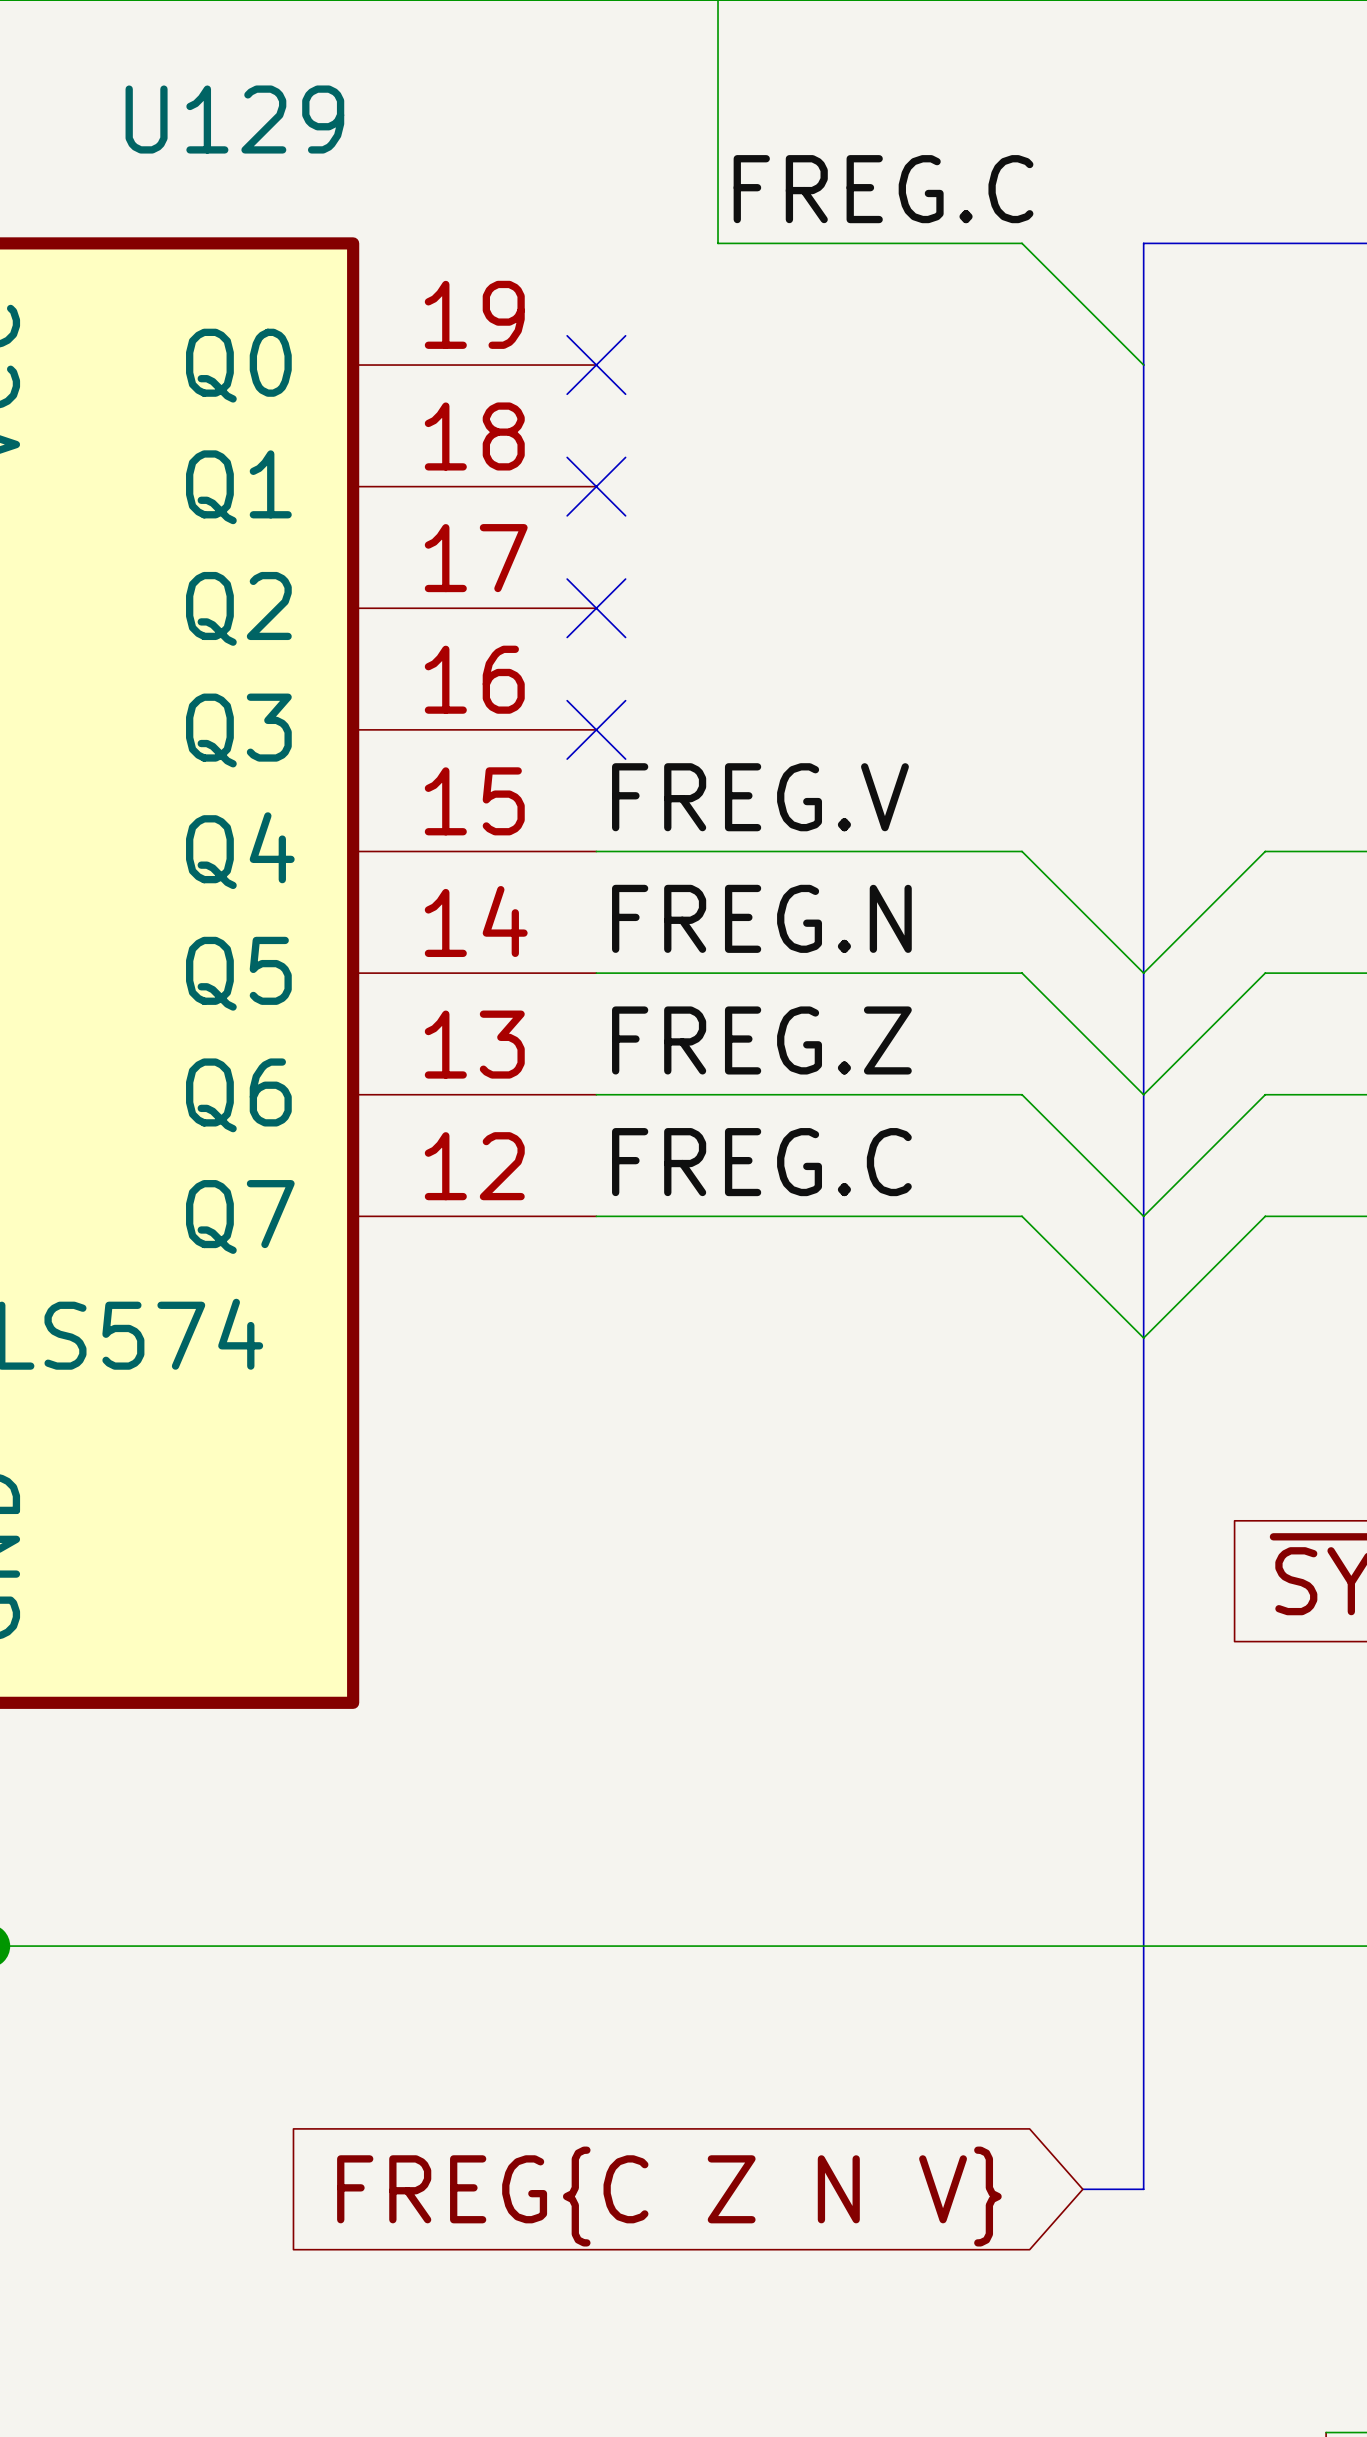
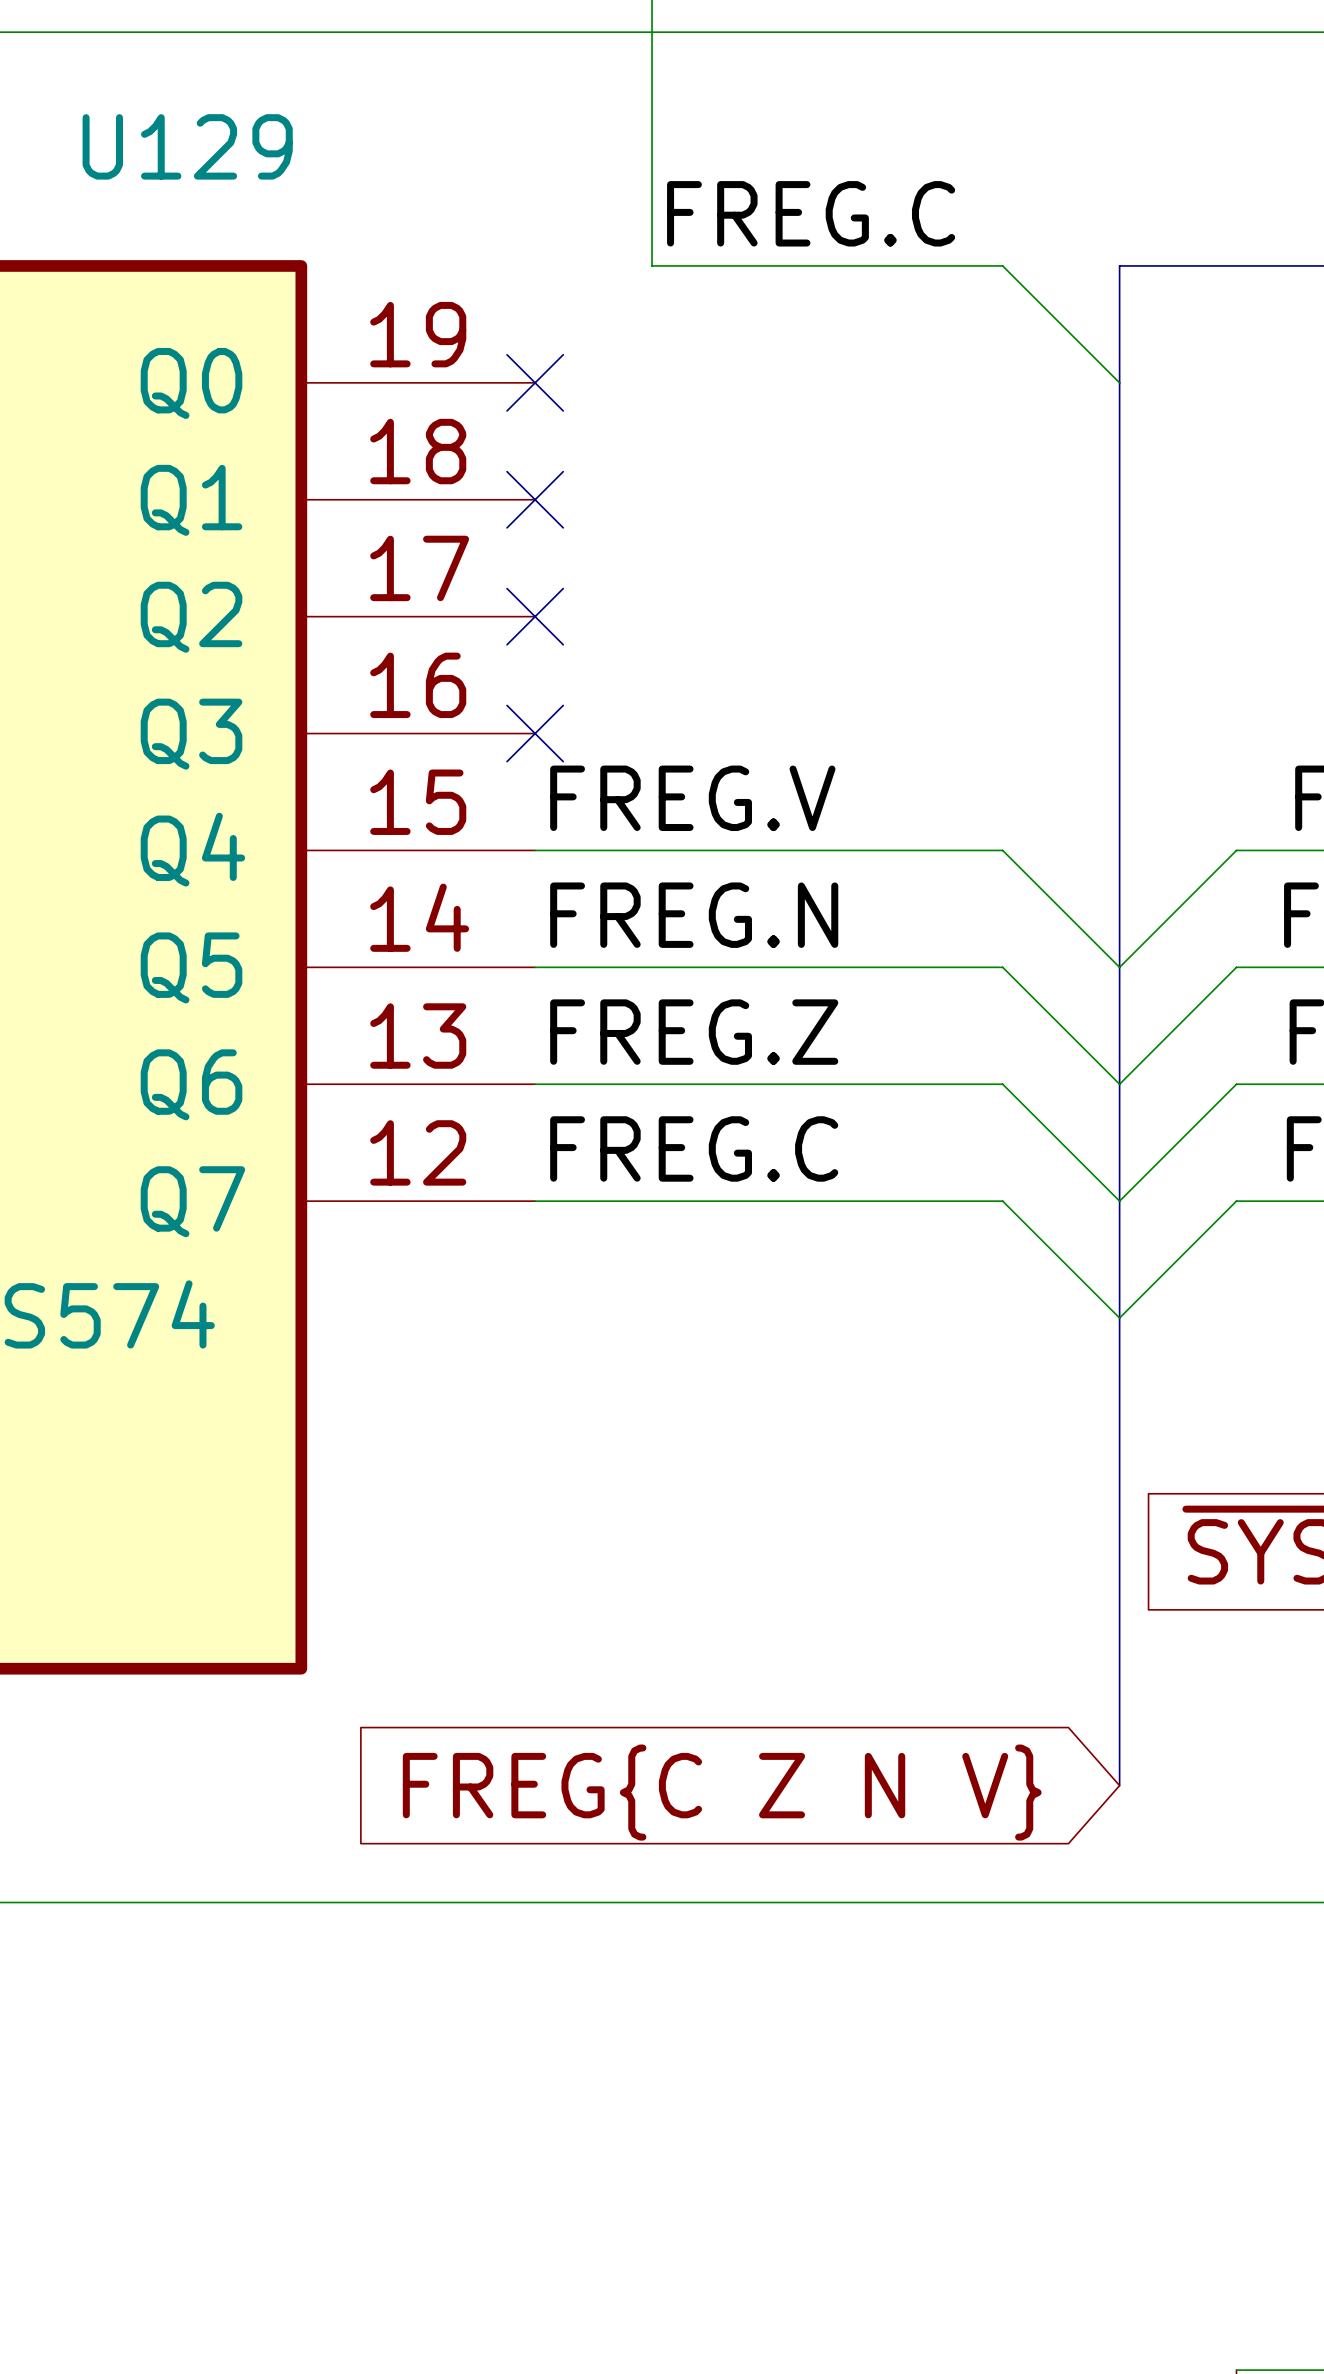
wire: (1022, 243) (1143, 365) -> (944, 265) (1002, 265) (1119, 382)
bus: (1204, 243) (1143, 243) (1143, 2189) (1082, 2189) -> (1119, 265) (1119, 1785)
wire: (1022, 851) (1143, 973) (1265, 851) (1326, 851) -> (944, 850) (1002, 850) (1119, 967) (1236, 850)
wire: (1022, 973) (1143, 1094) (1265, 973) (1326, 973) -> (944, 967) (1002, 967) (1119, 1084) (1236, 967)
wire: (1022, 1094) (1143, 1216) (1265, 1094) (1326, 1094) -> (944, 1084) (1002, 1084) (1119, 1201) (1236, 1084)
wire: (1022, 1216) (1143, 1337) (1265, 1216) (1326, 1216) -> (944, 1201) (1002, 1201) (1119, 1318) (1236, 1201)
global label position: FREG{C Z N V} (669, 2196) -> FREG{C Z N V} (722, 1792)

